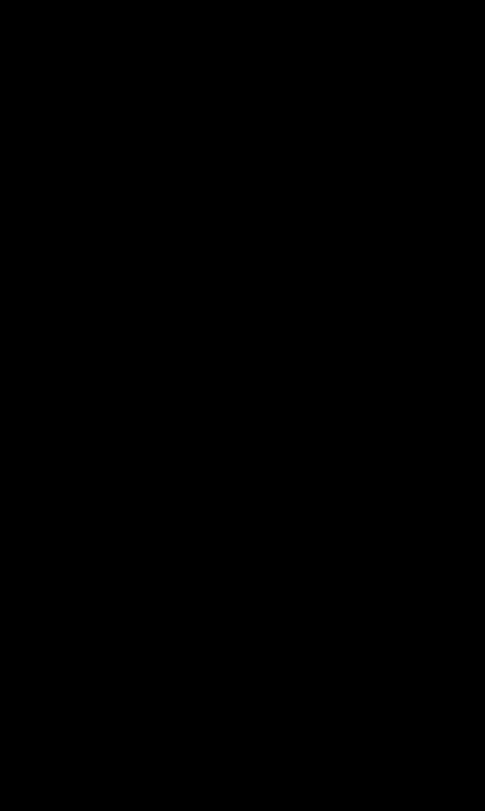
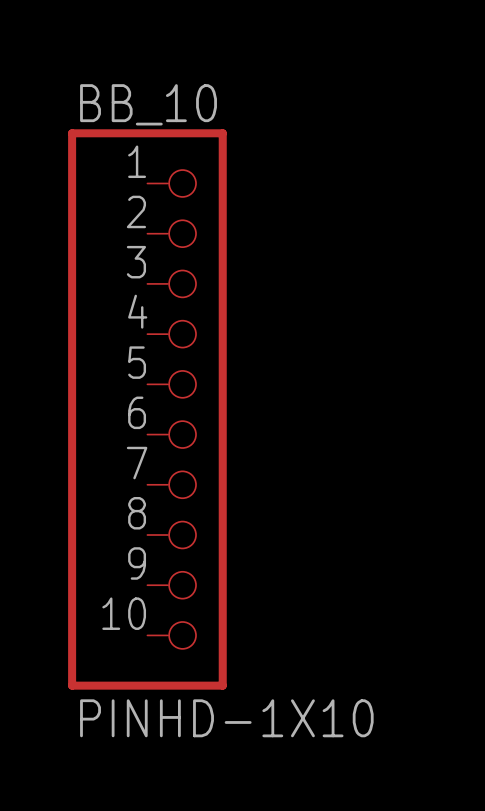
BB_10: none -> PINHD-1X10 (147, 409)

